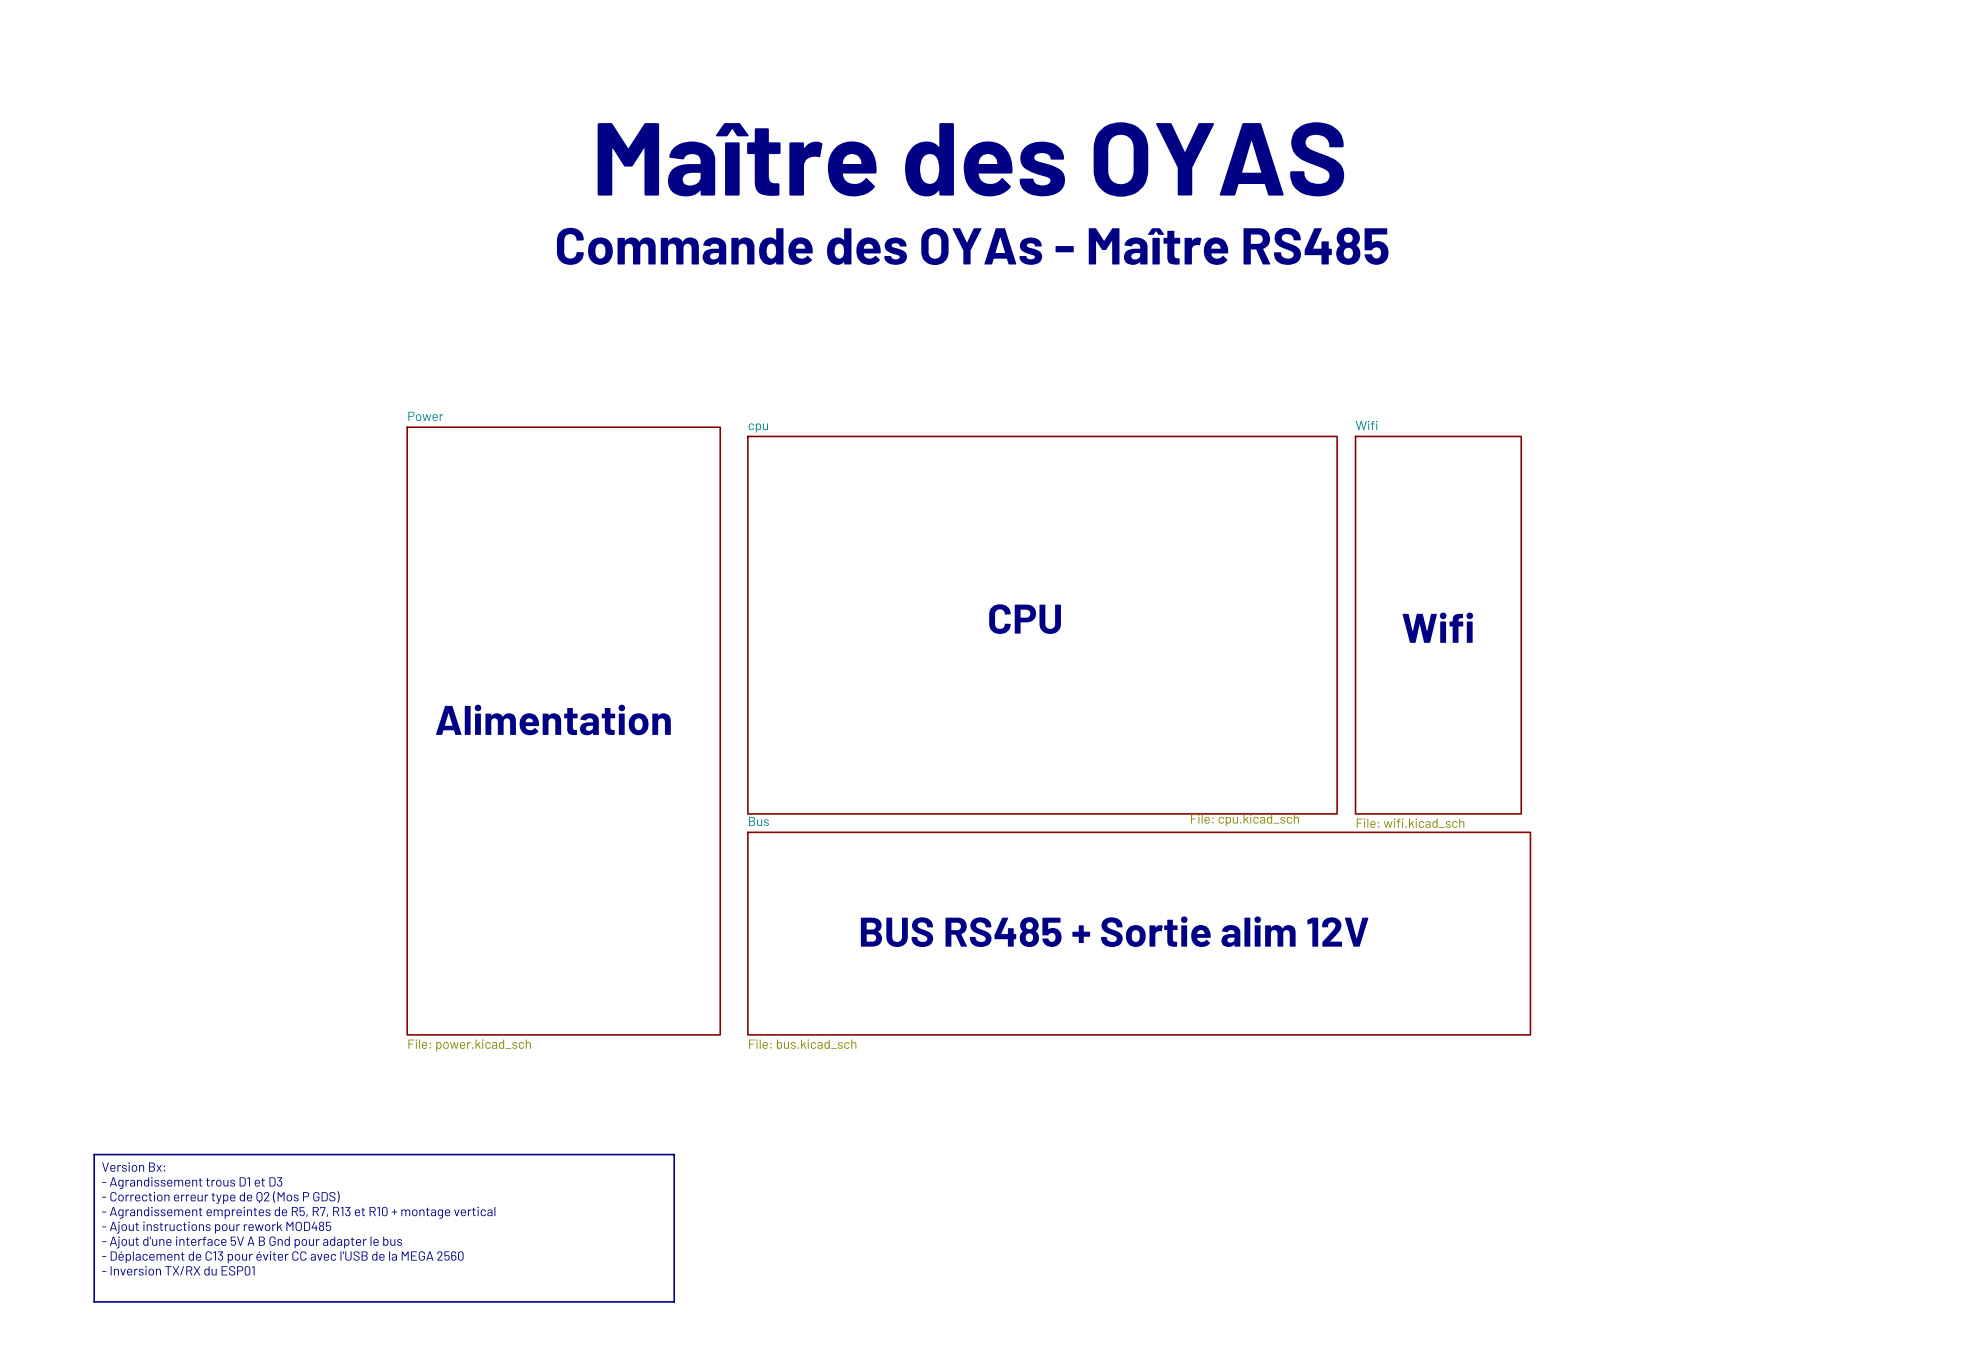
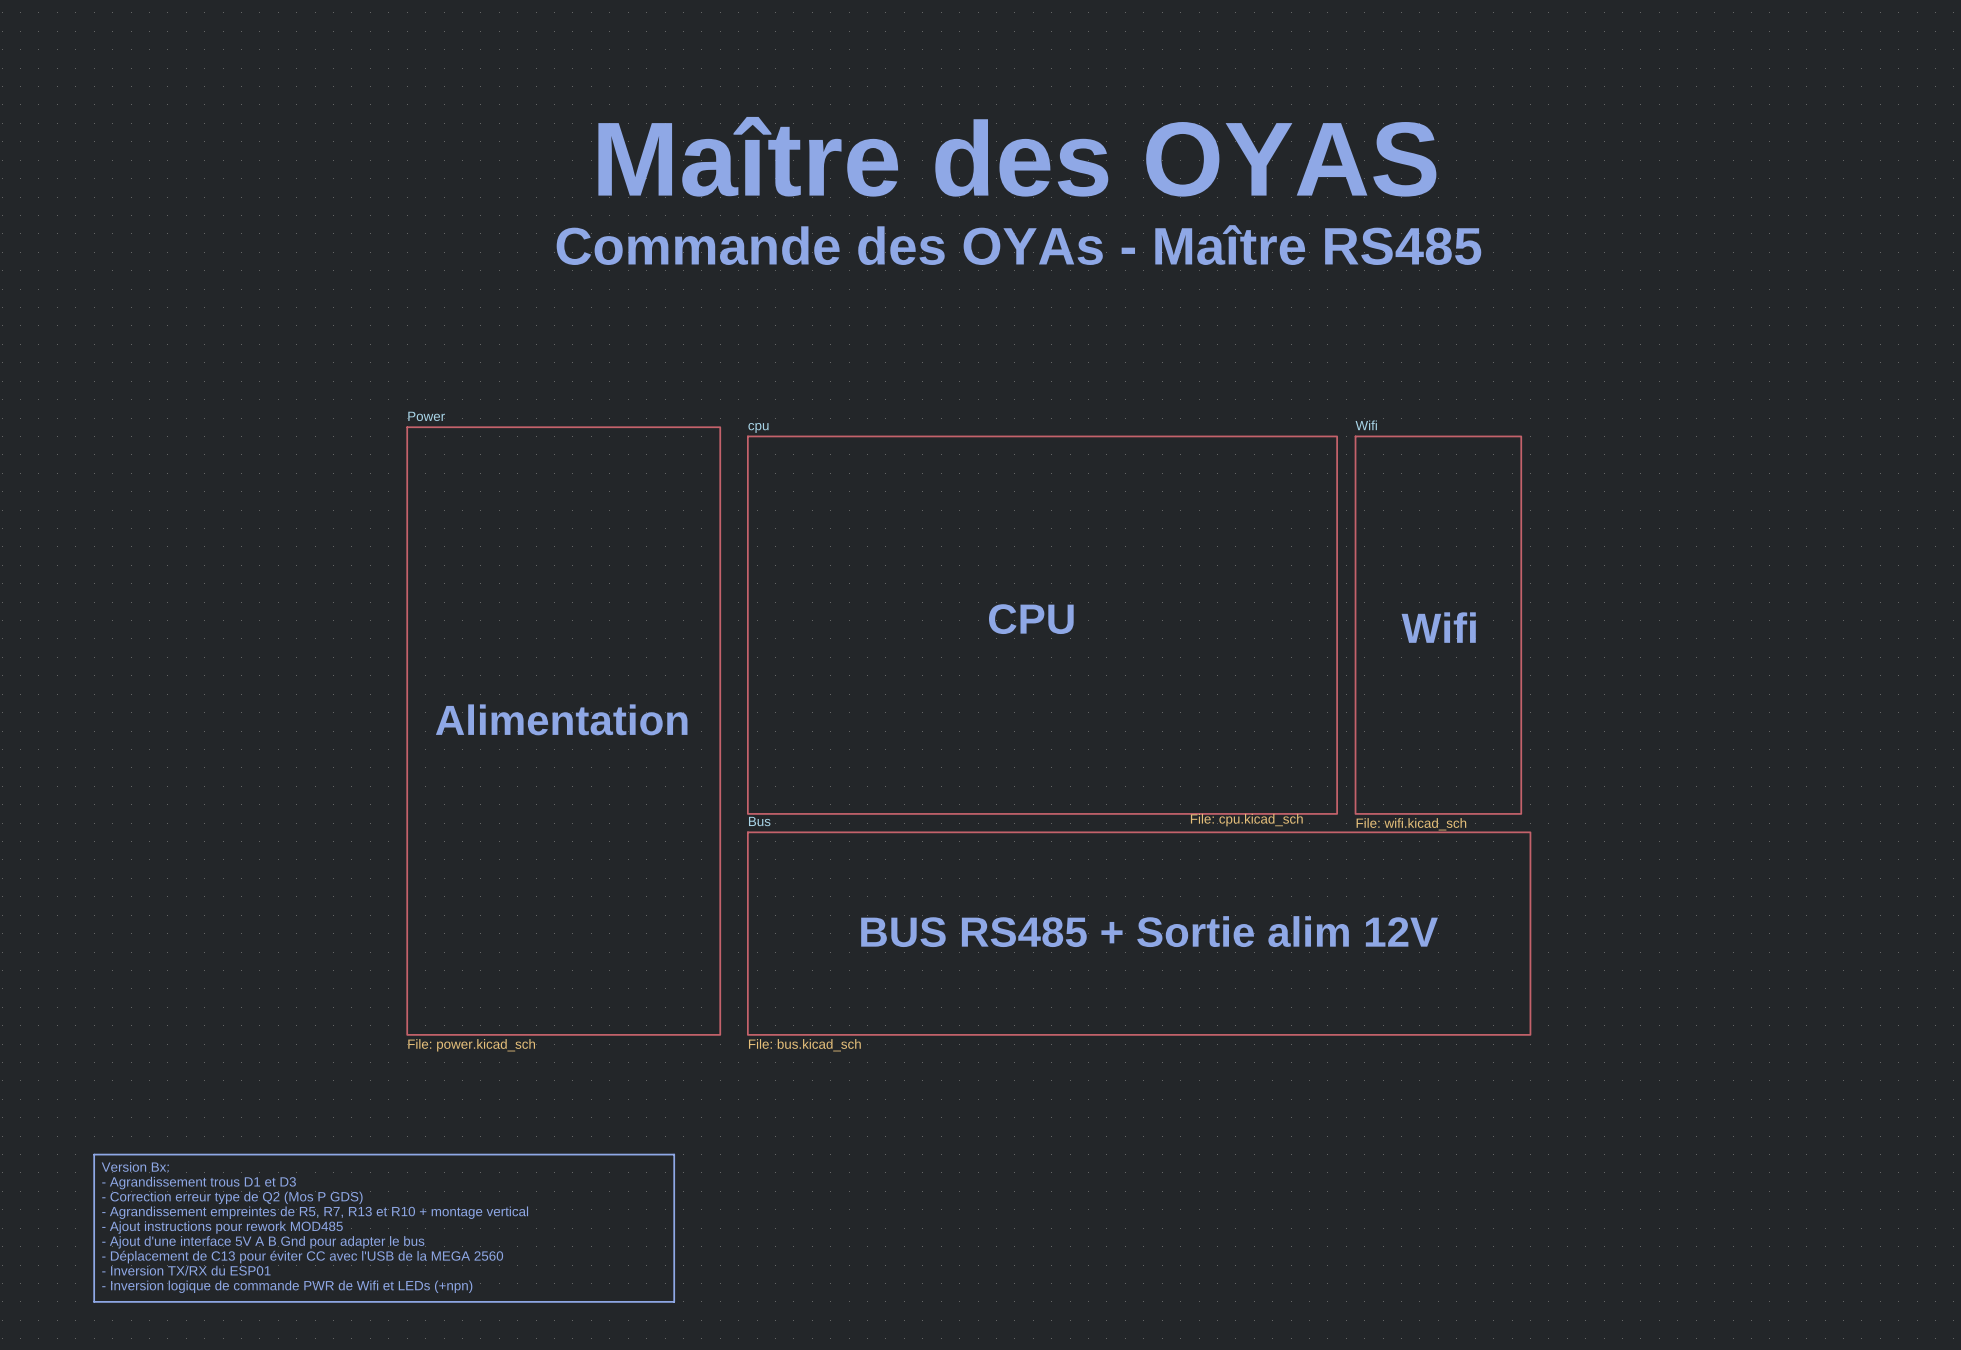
text: none -> - Inversion logique de commande PWR de Wifi et LEDs (+npn) (287, 1286)

